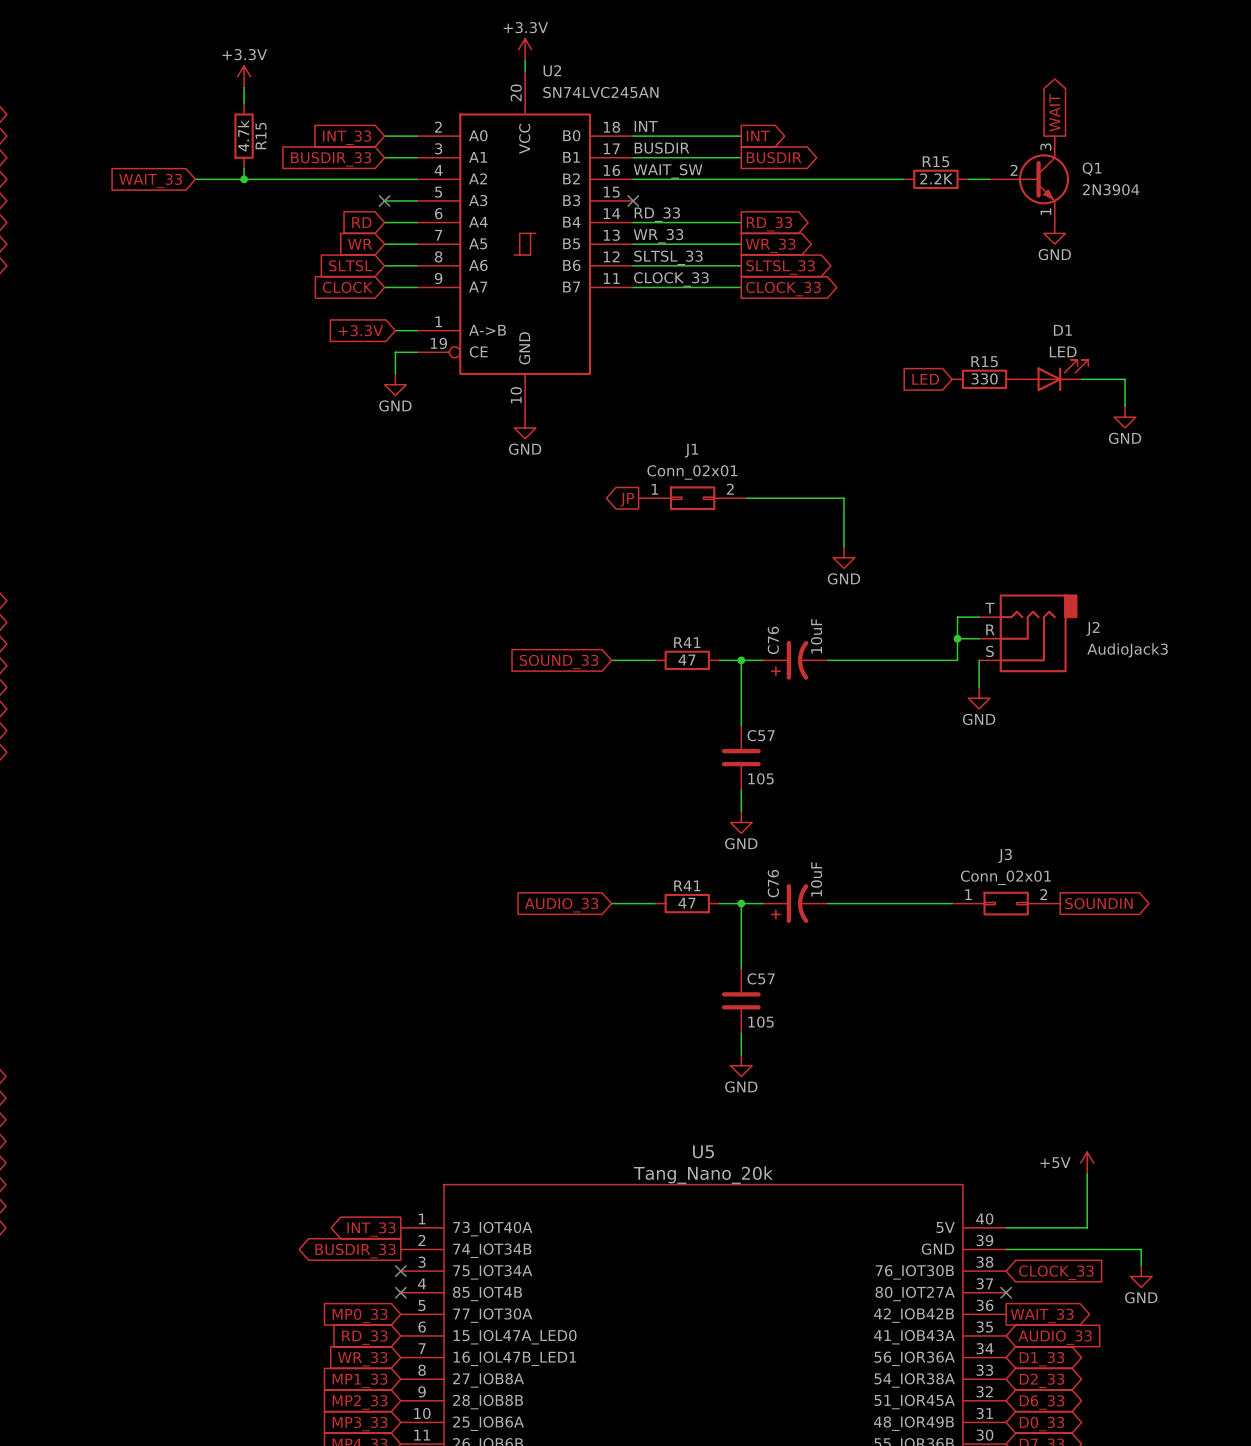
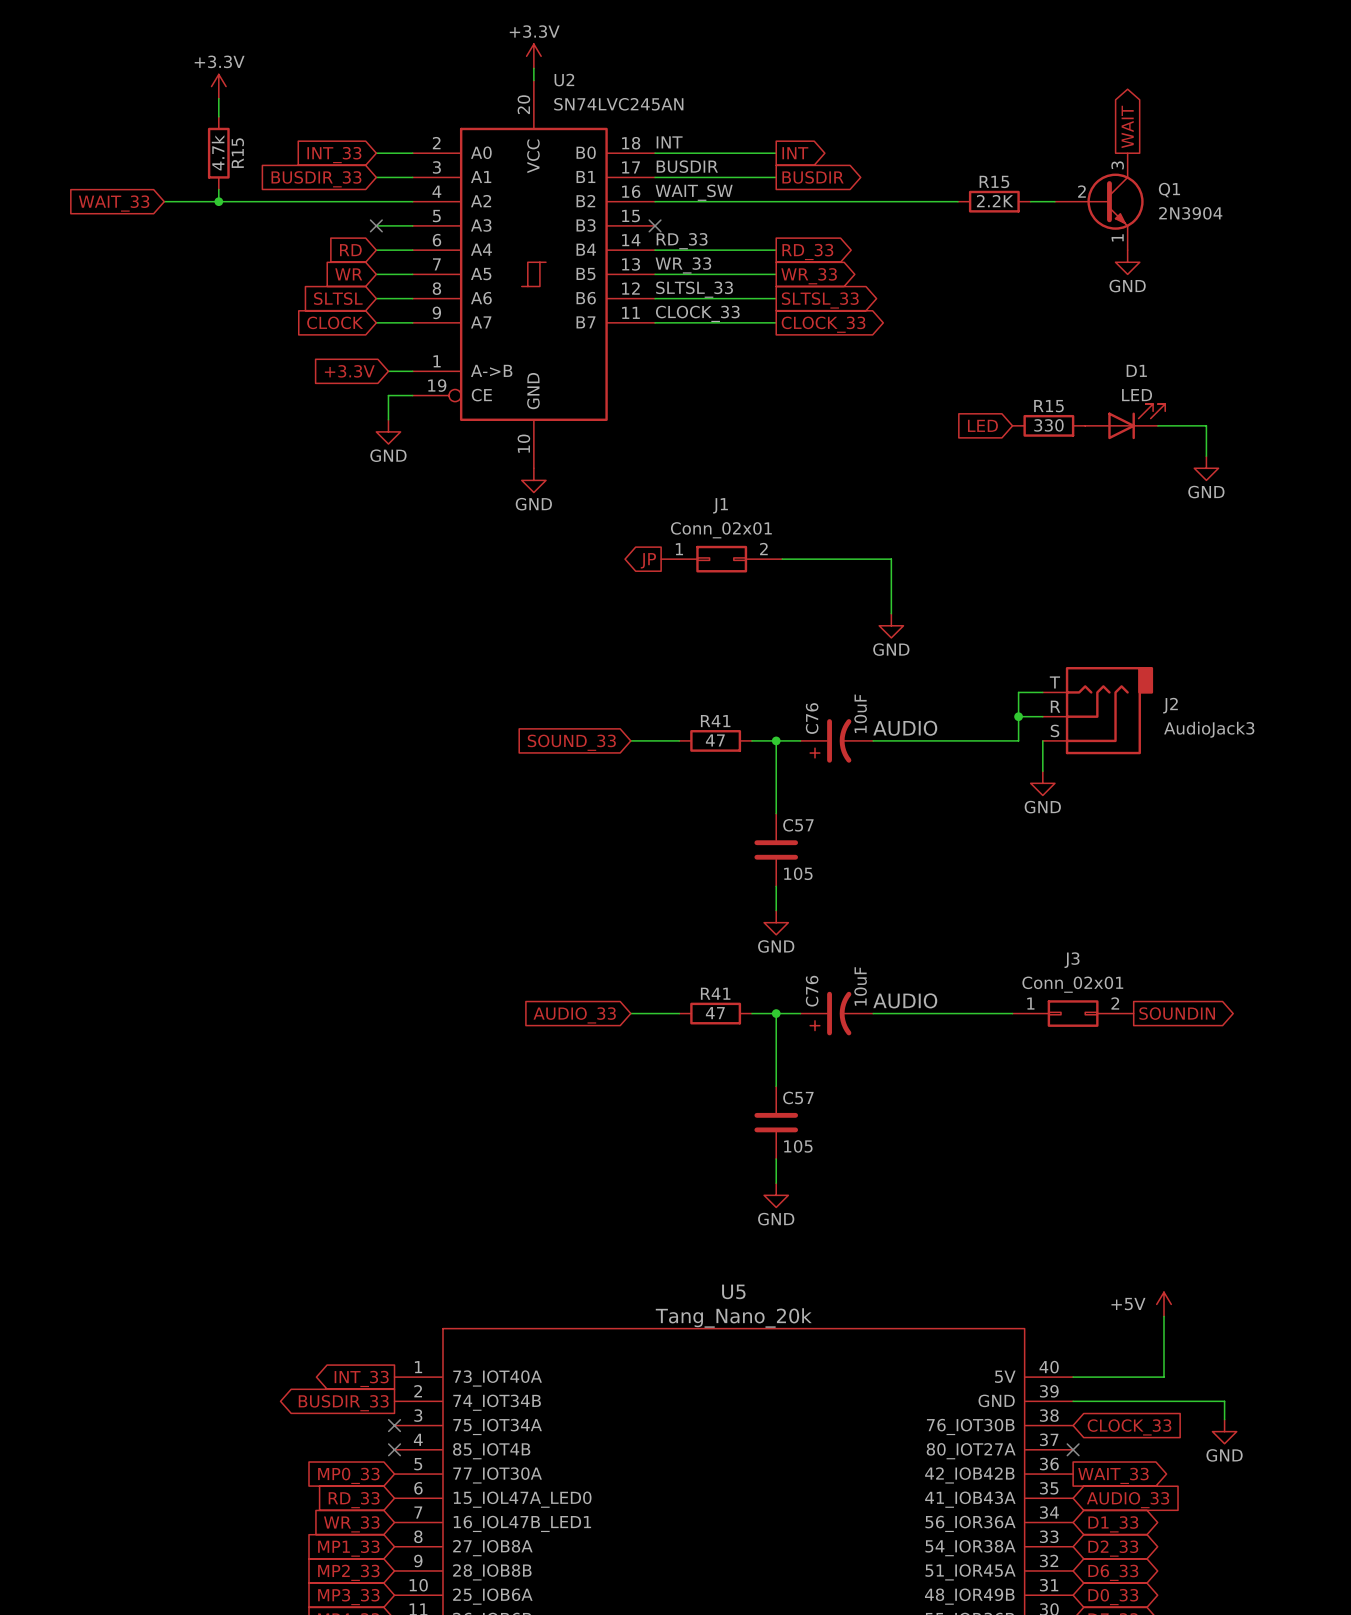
label: none -> AUDIO (905, 728)
label: none -> AUDIO (905, 1000)

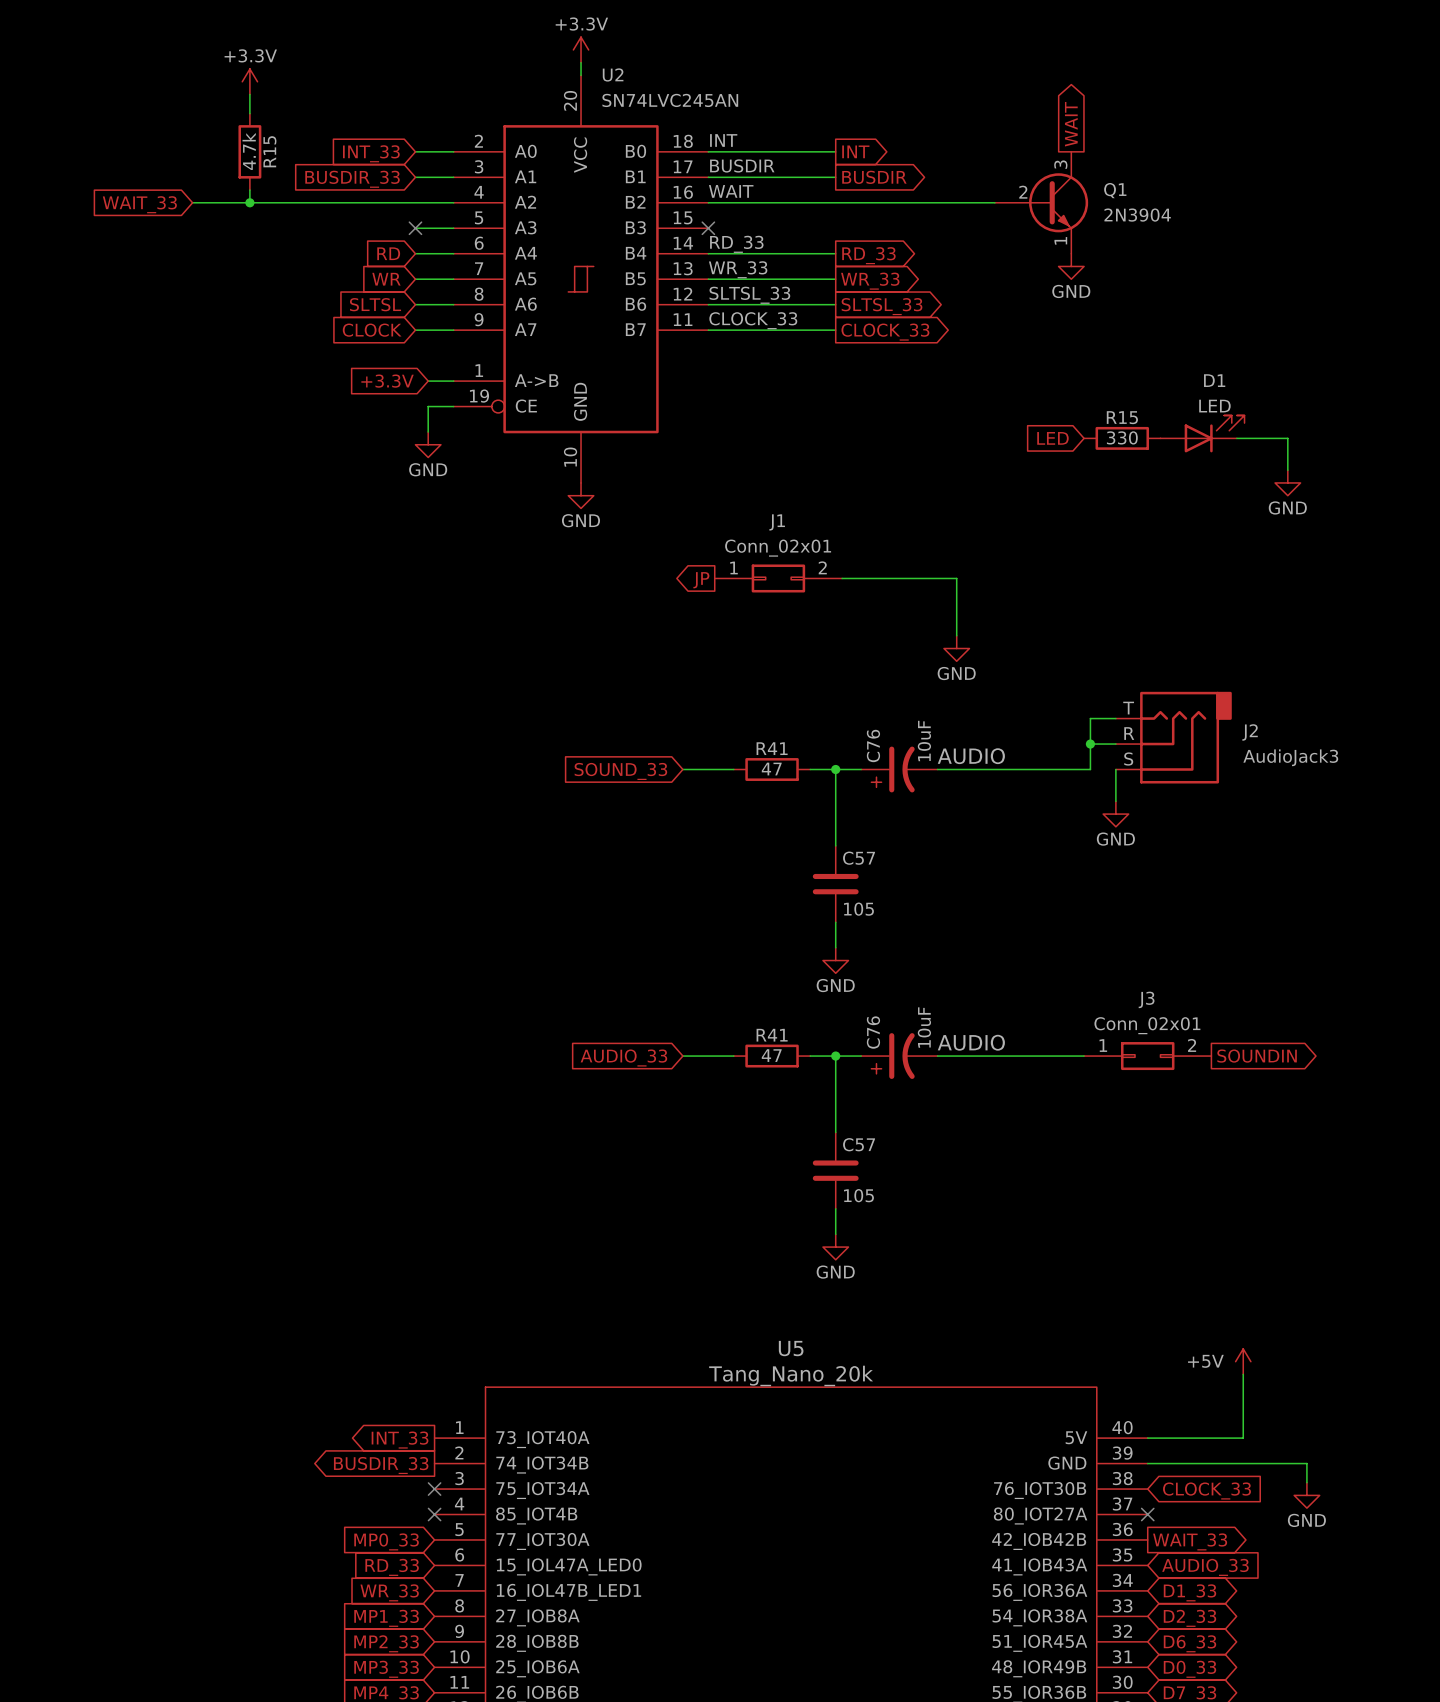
global label position: WAIT (1127, 126) -> WAIT (1071, 124)
label: WAIT_SW (694, 192) -> WAIT (731, 191)
R15: 2.2K (994, 201) -> none
wire: (1030, 201) (1054, 201) -> none
Q1 position: (1099, 201) -> (1041, 202)
power symbol position: GND (1127, 262) -> GND (1071, 266)

